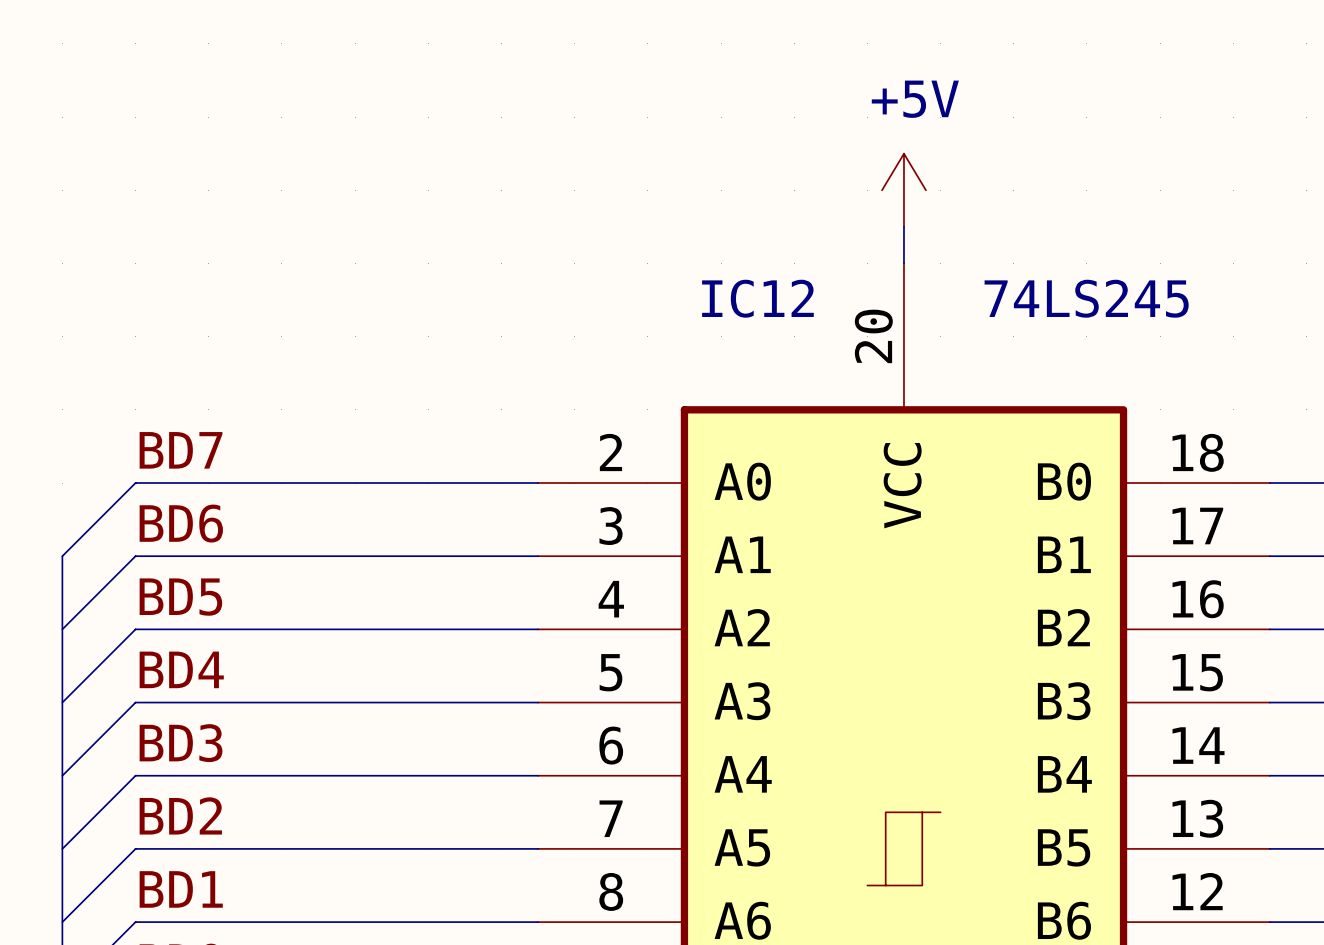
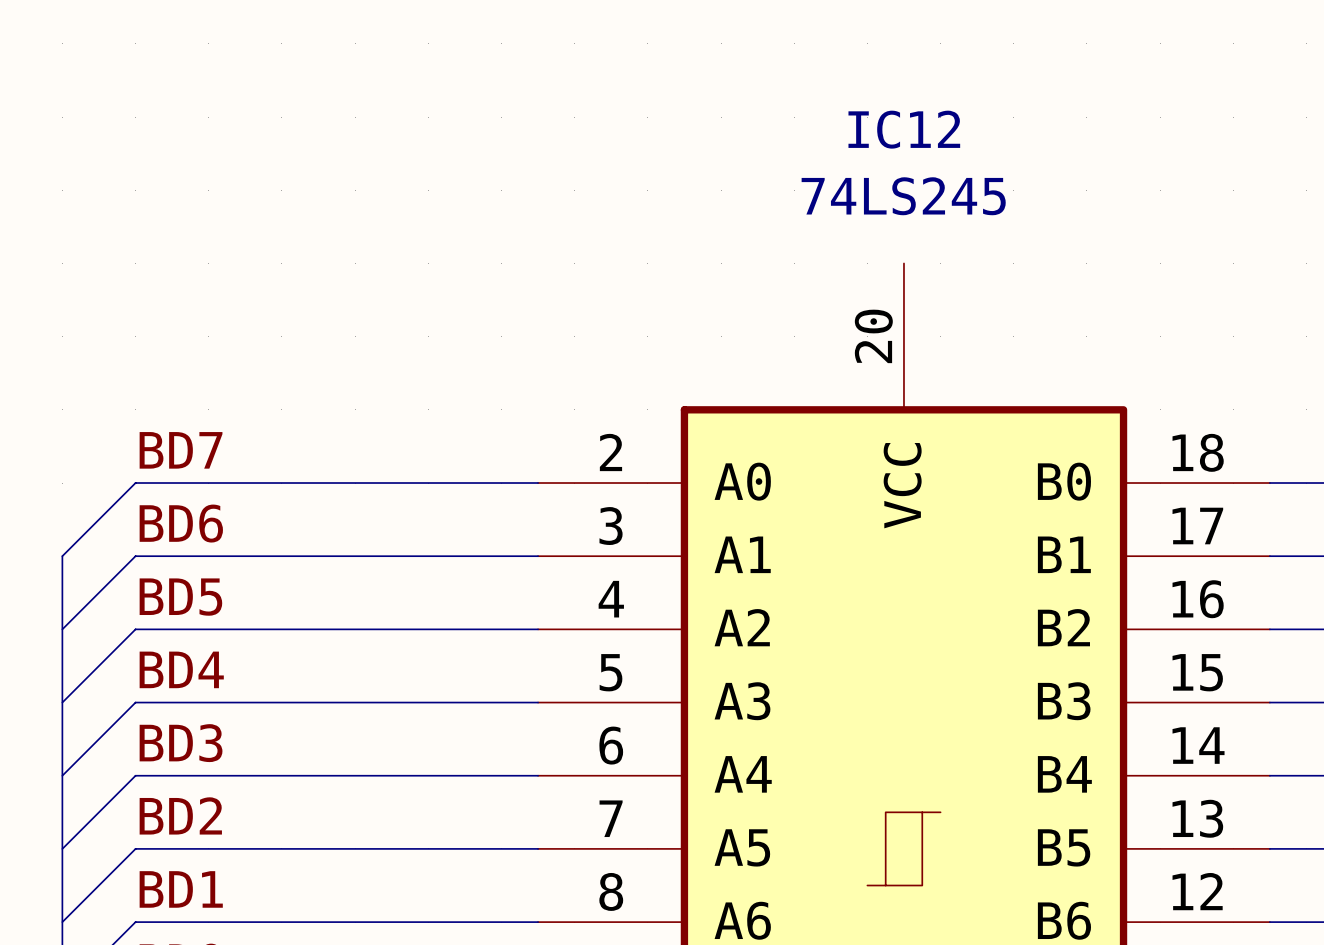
power symbol: +5V (903, 190) -> none
wire: (903, 226) (903, 263) -> none
IC12 name position: IC12 (757, 298) -> IC12 (904, 129)
IC12 value position: 74LS245 (1086, 298) -> 74LS245 (903, 196)

